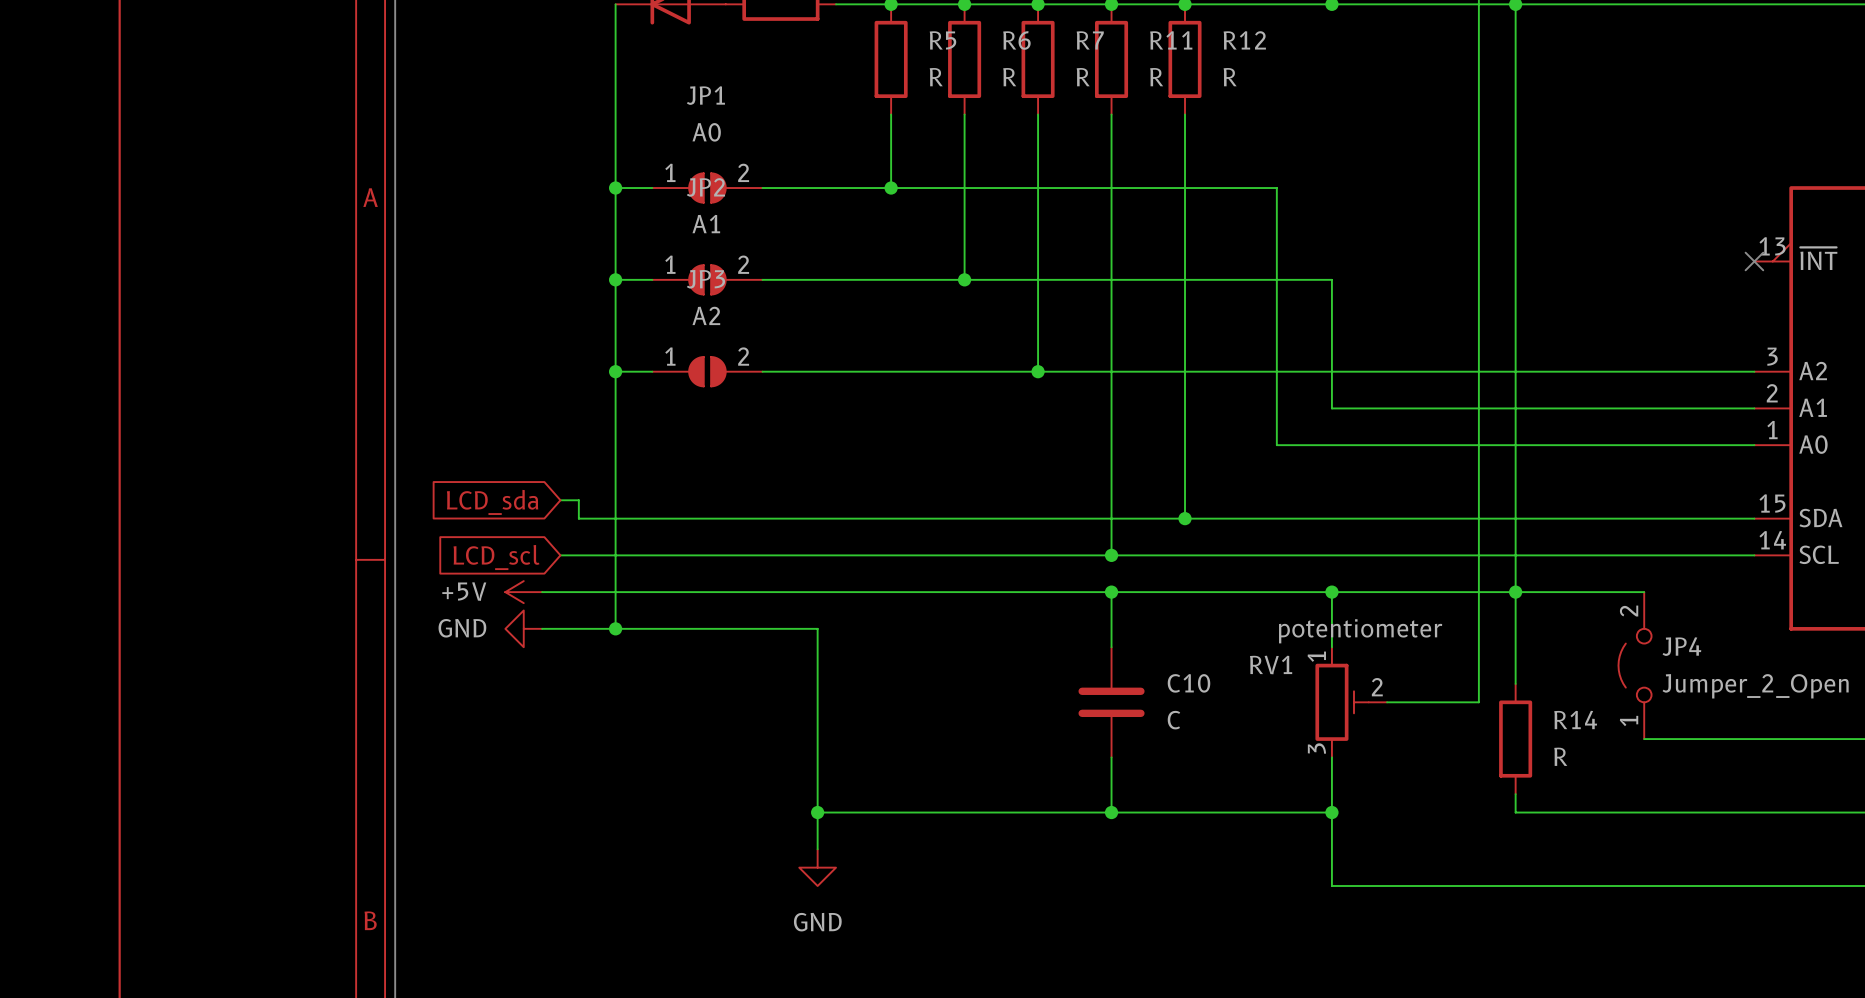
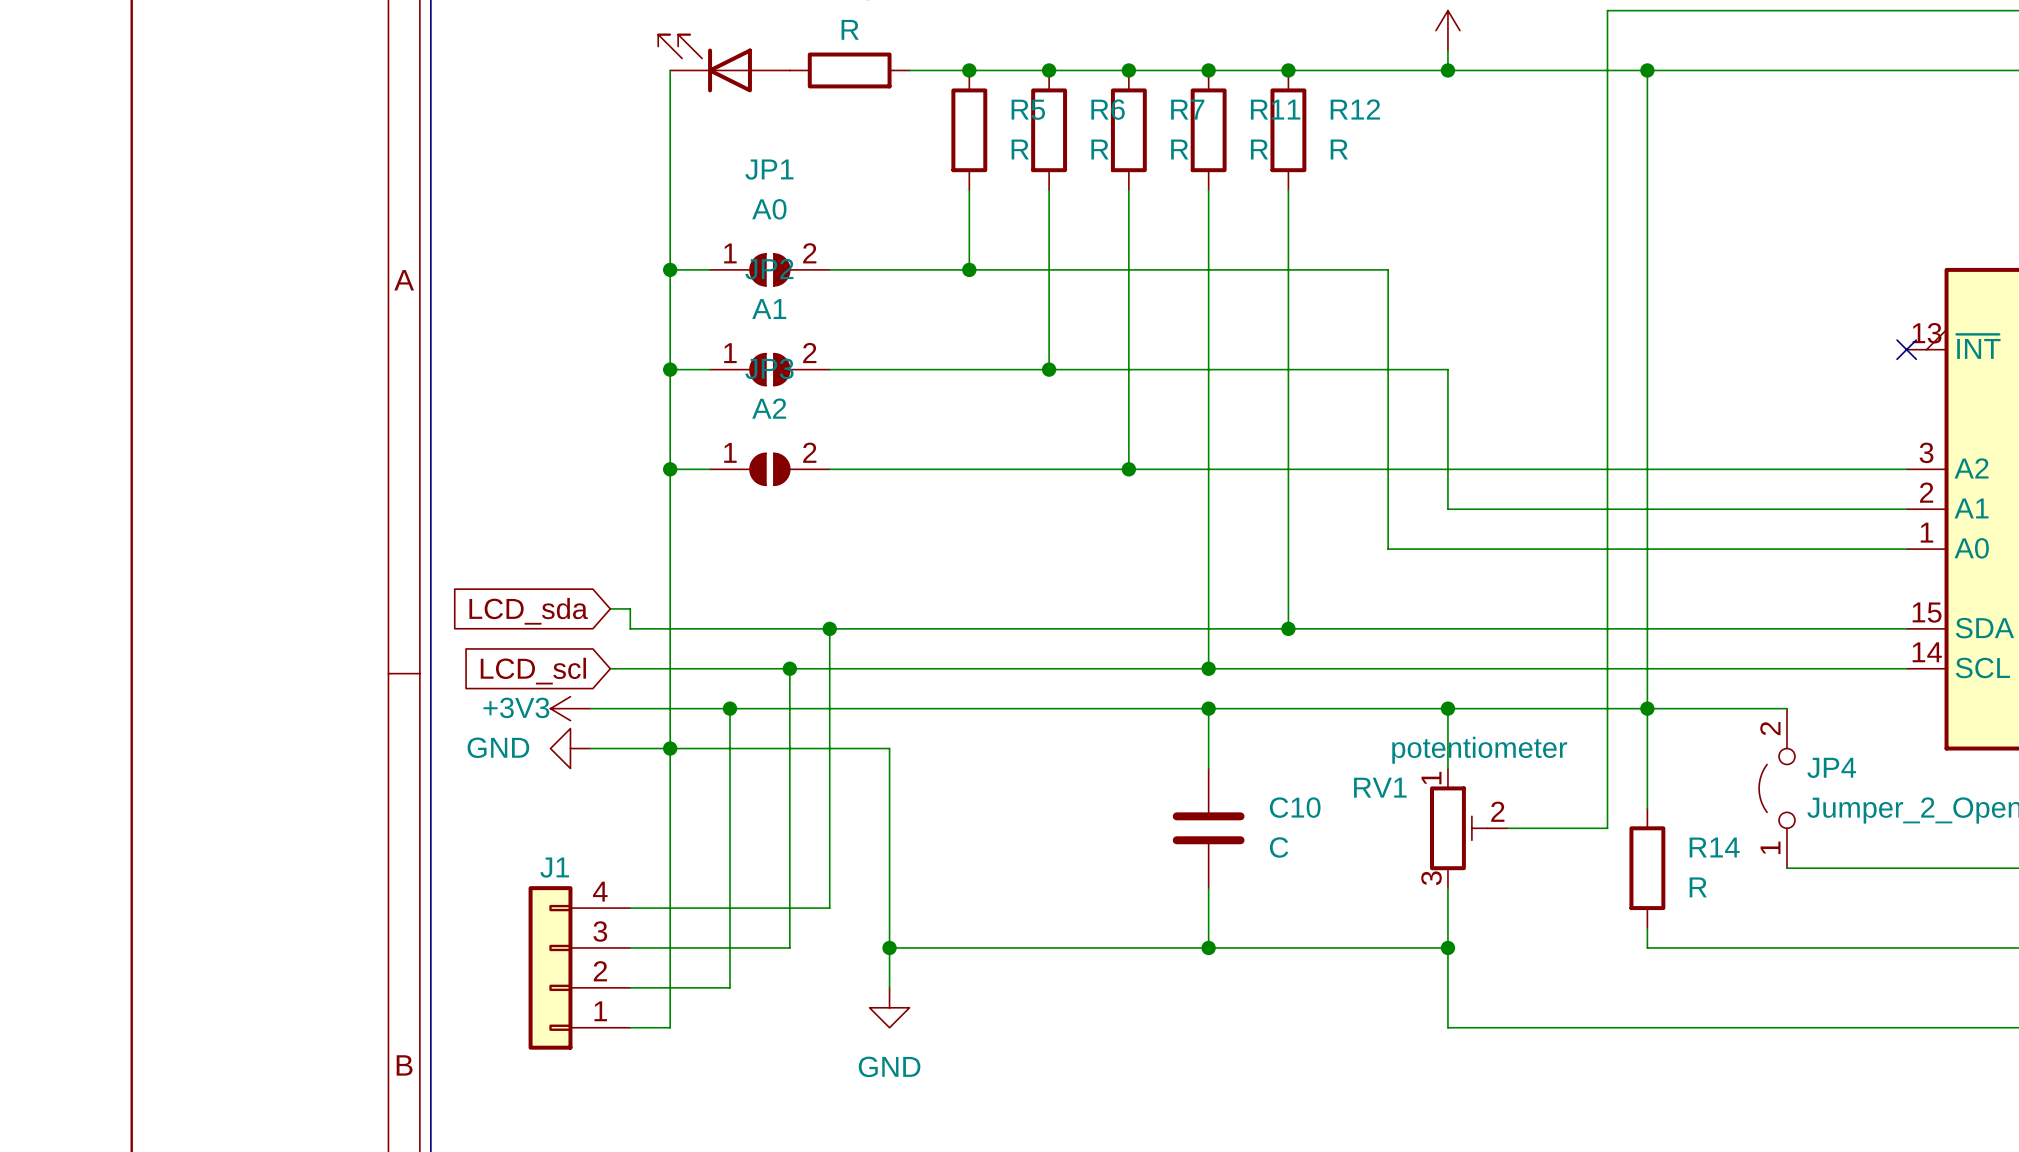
wire: none -> (829, 628) (829, 908) (630, 908)
junction: none -> (829, 628)
wire: none -> (789, 668) (789, 947) (630, 947)
junction: none -> (789, 668)
power symbol: +5V (523, 592) -> +3V3 (570, 708)
wire: none -> (730, 708) (730, 987) (630, 987)
junction: none -> (730, 708)
wire: none -> (670, 748) (670, 1027) (630, 1027)
J1: none -> (579, 967)

